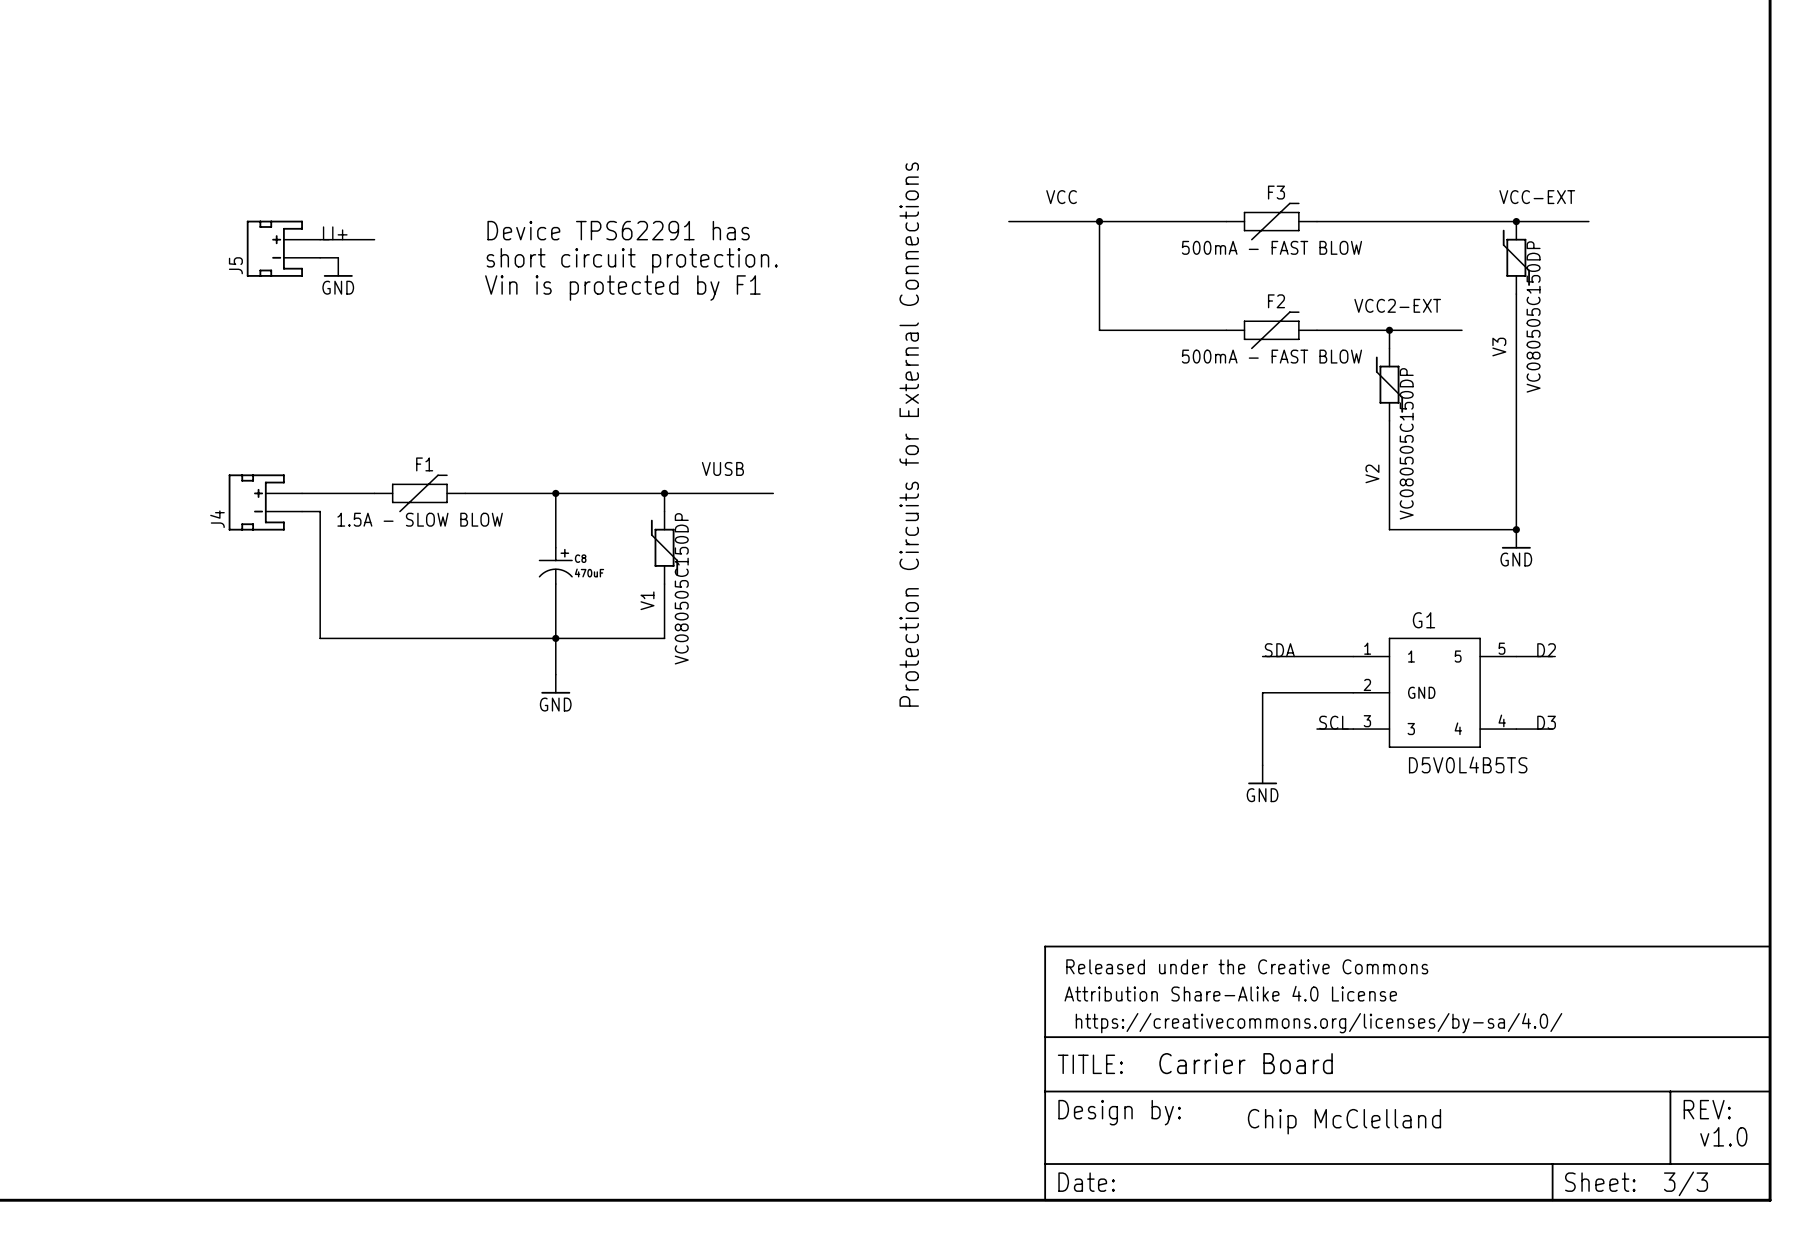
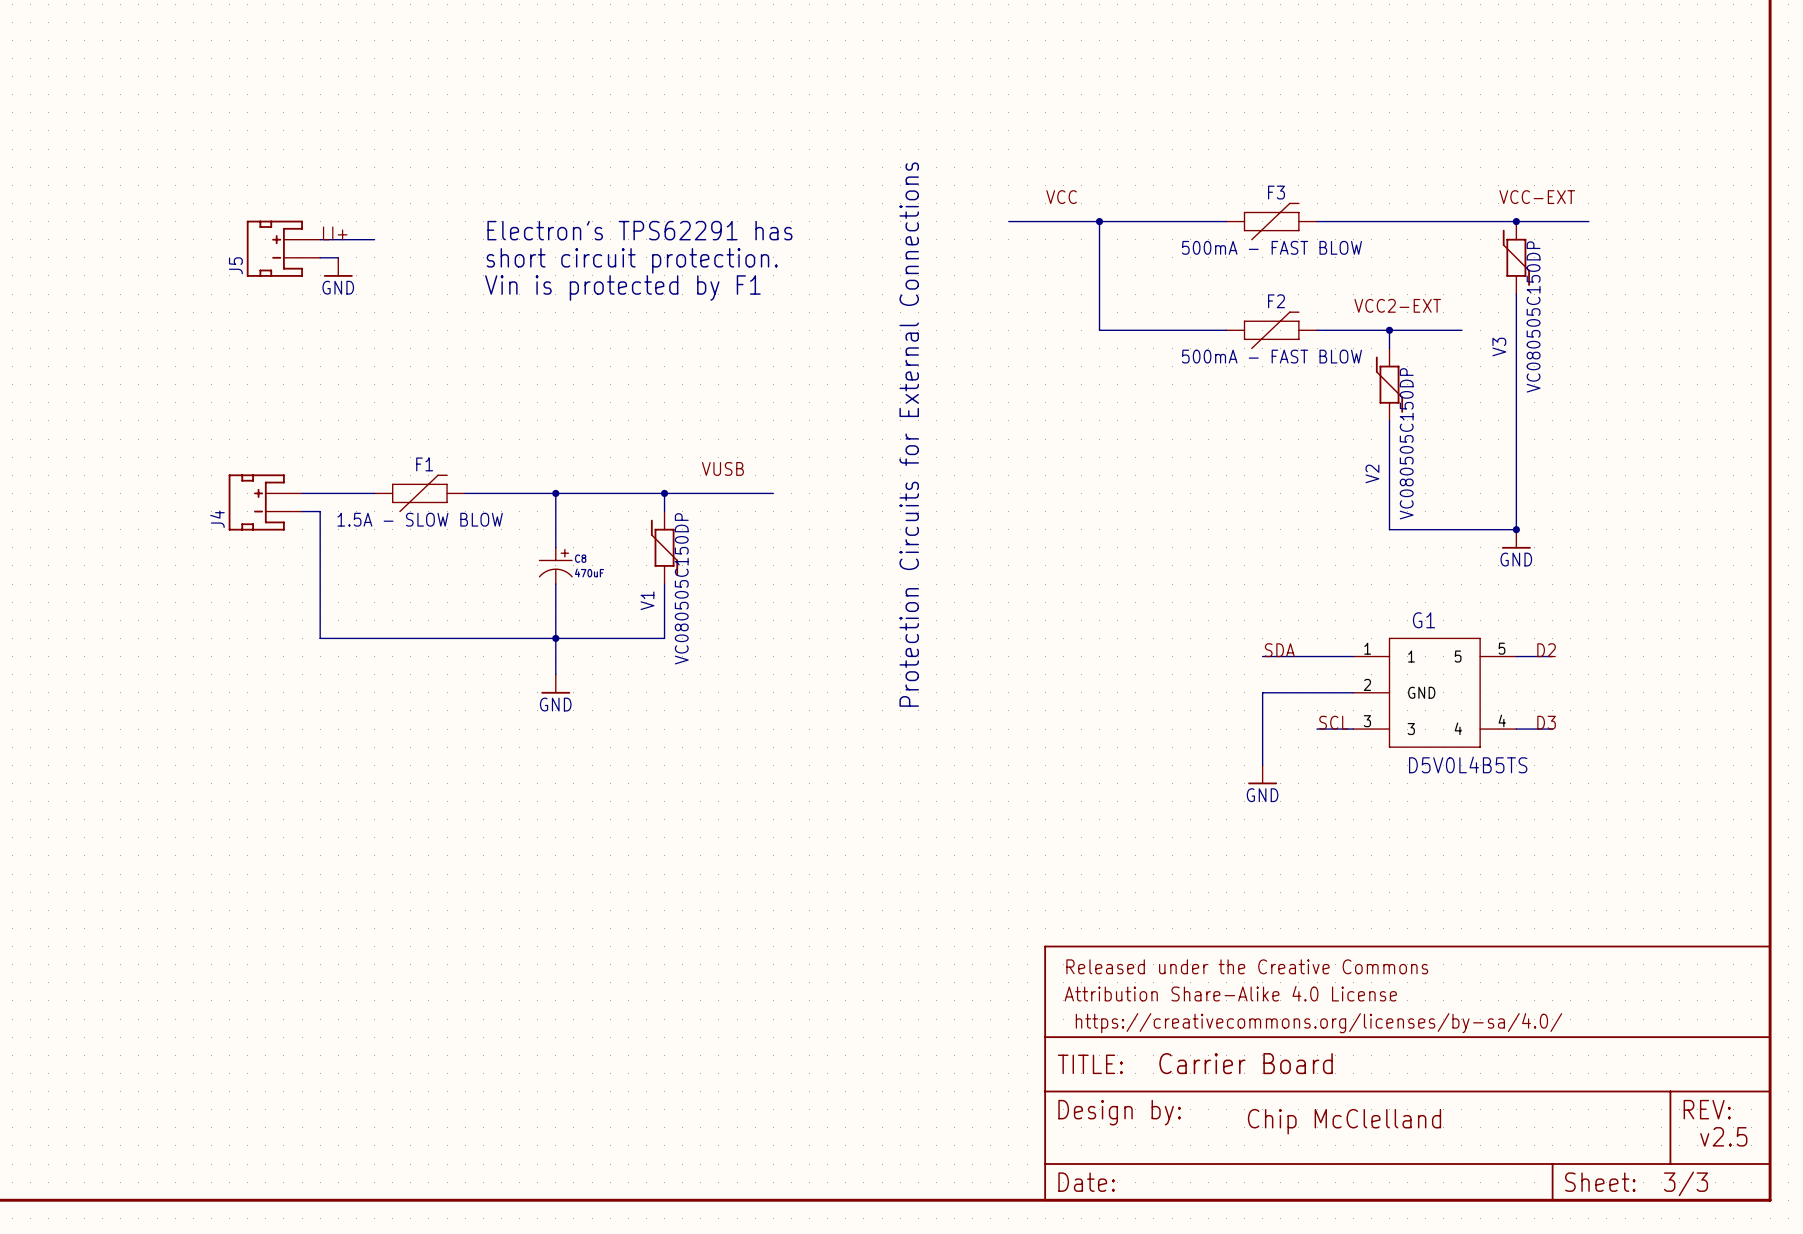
text: Device TPS62291 has (618, 230) -> Electron's TPS62291 has (639, 230)
text: v1.0 (1723, 1136) -> v2.5 (1723, 1136)

